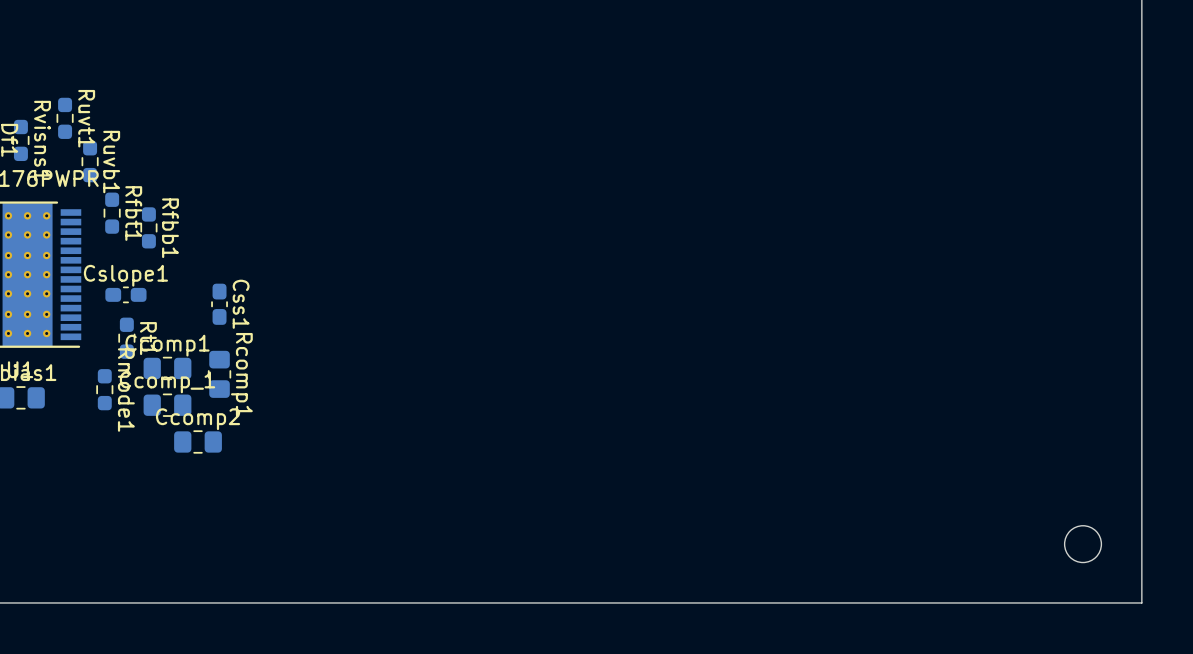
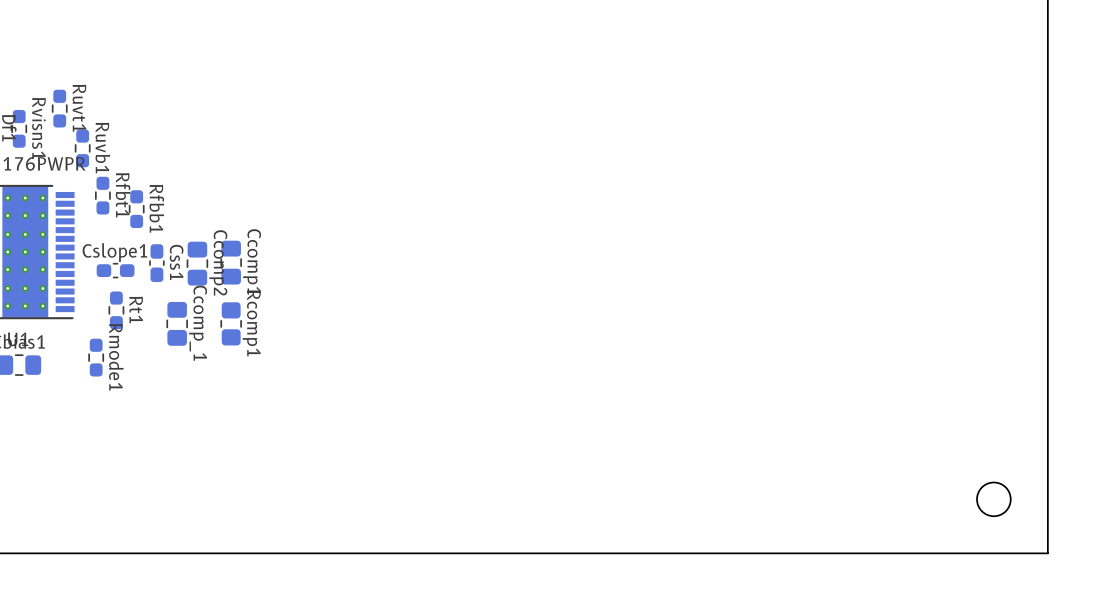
Css1 position: (219, 304) -> (156, 263)
Ccomp1 rotation: 0° (167, 368) -> 90° clockwise (231, 262)
Ccomp1 position: (167, 368) -> (231, 262)
Rcomp1 position: (219, 374) -> (231, 323)
Ccomp_1 rotation: 0° (167, 405) -> 90° clockwise (177, 323)
Ccomp_1 position: (167, 405) -> (177, 323)
Ccomp2 rotation: 0° (198, 441) -> 90° clockwise (197, 263)
Ccomp2 position: (198, 441) -> (197, 263)

